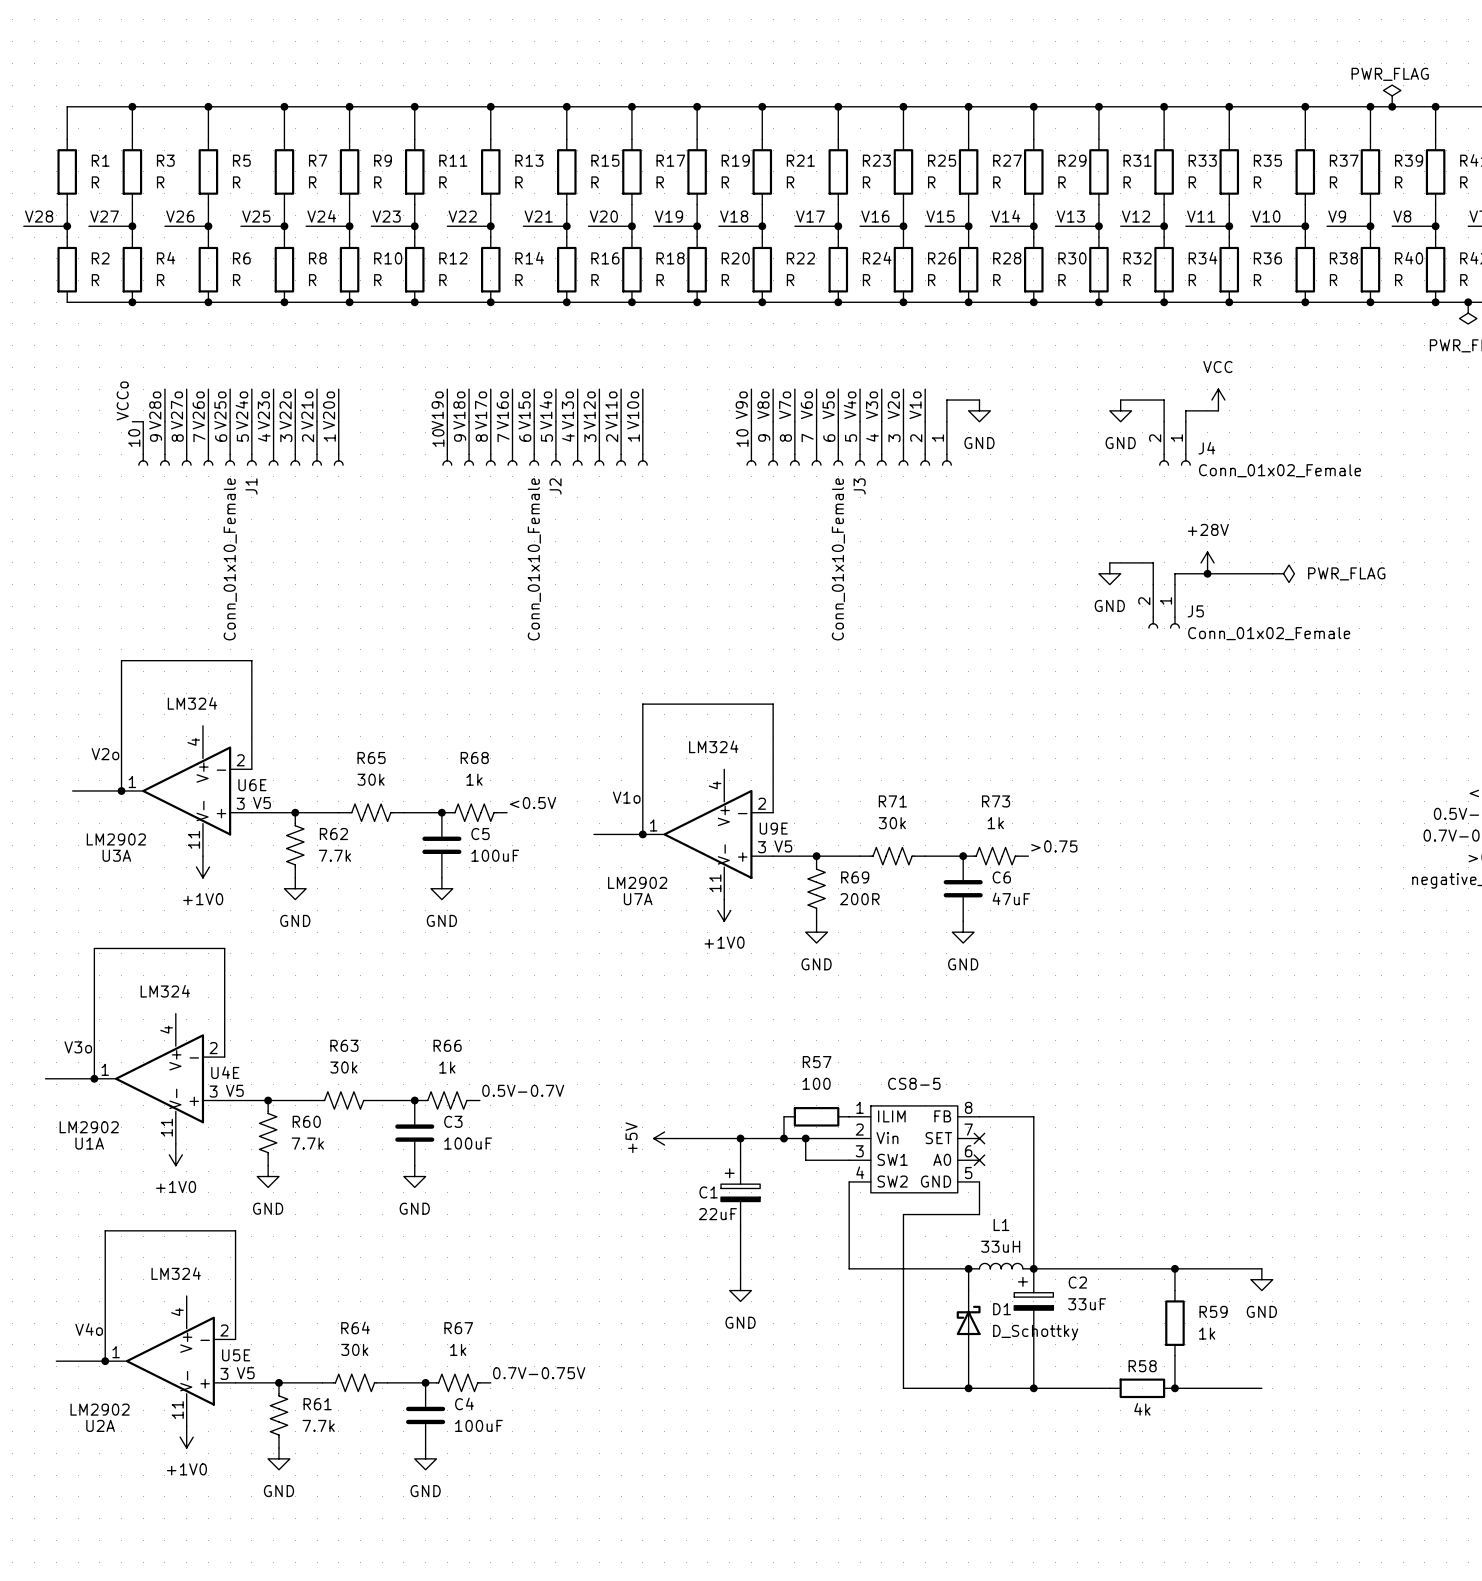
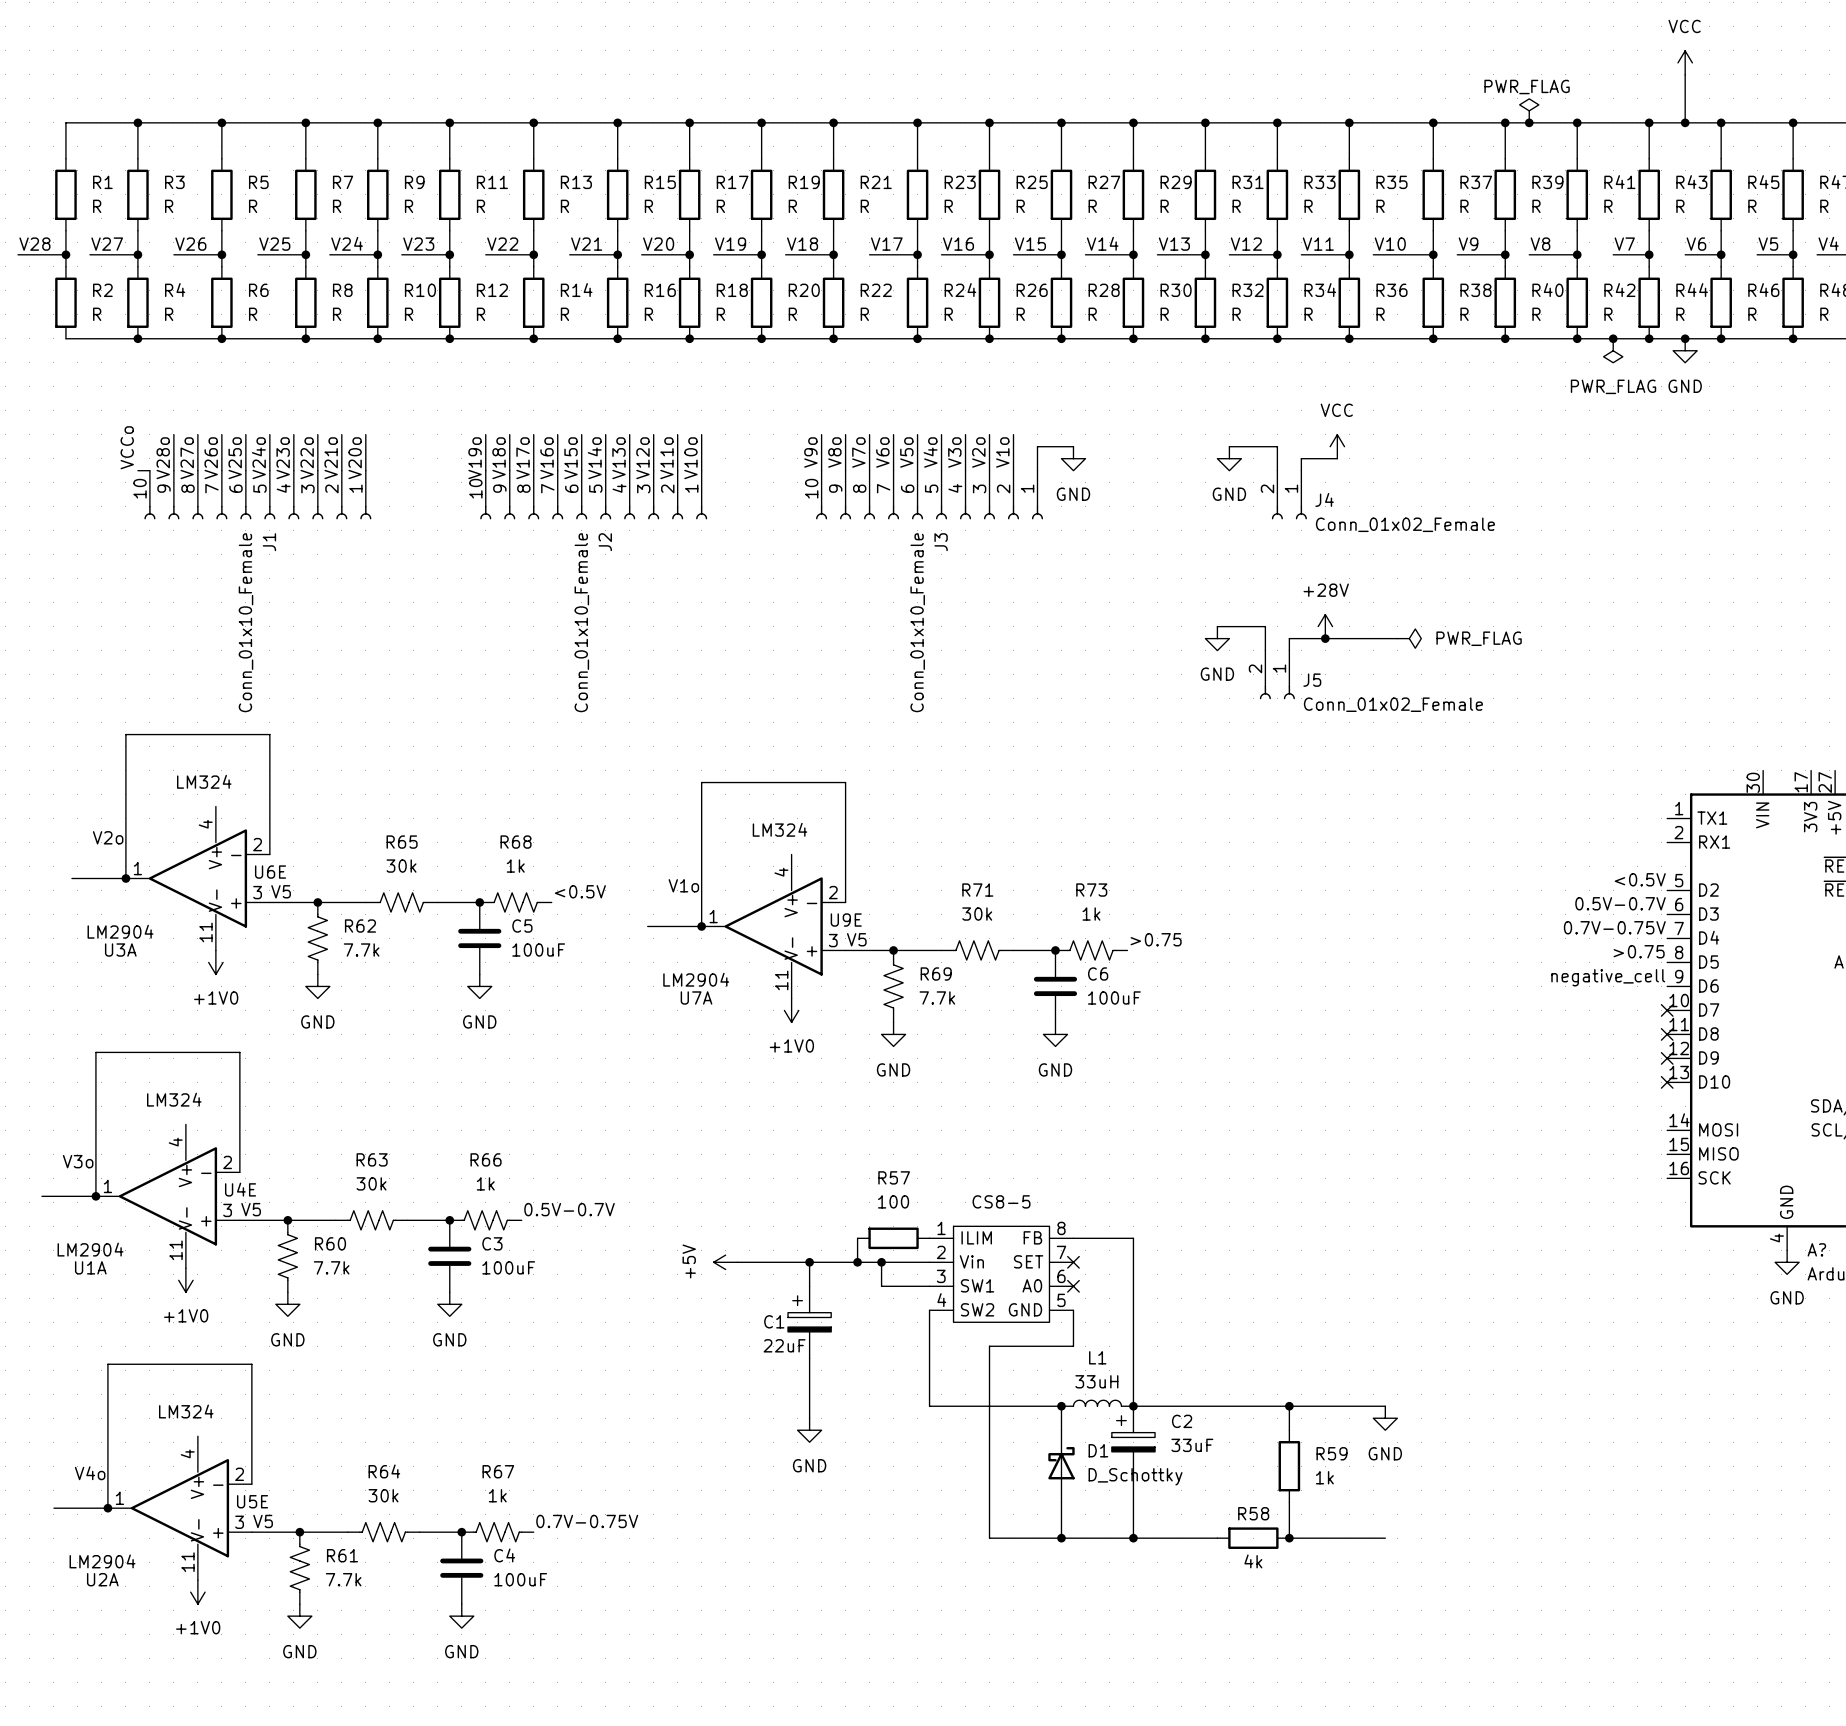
U3A value: LM2902 (116, 839) -> LM2904 (120, 931)
U7A value: LM2902 (637, 882) -> LM2904 (696, 979)
C6 value: 47uF (1011, 898) -> 100uF (1114, 997)
R69 value: 200R (859, 899) -> 7.7k (937, 997)
U1A value: LM2902 (89, 1127) -> LM2904 (90, 1249)
U2A value: LM2902 (100, 1409) -> LM2904 (102, 1561)

